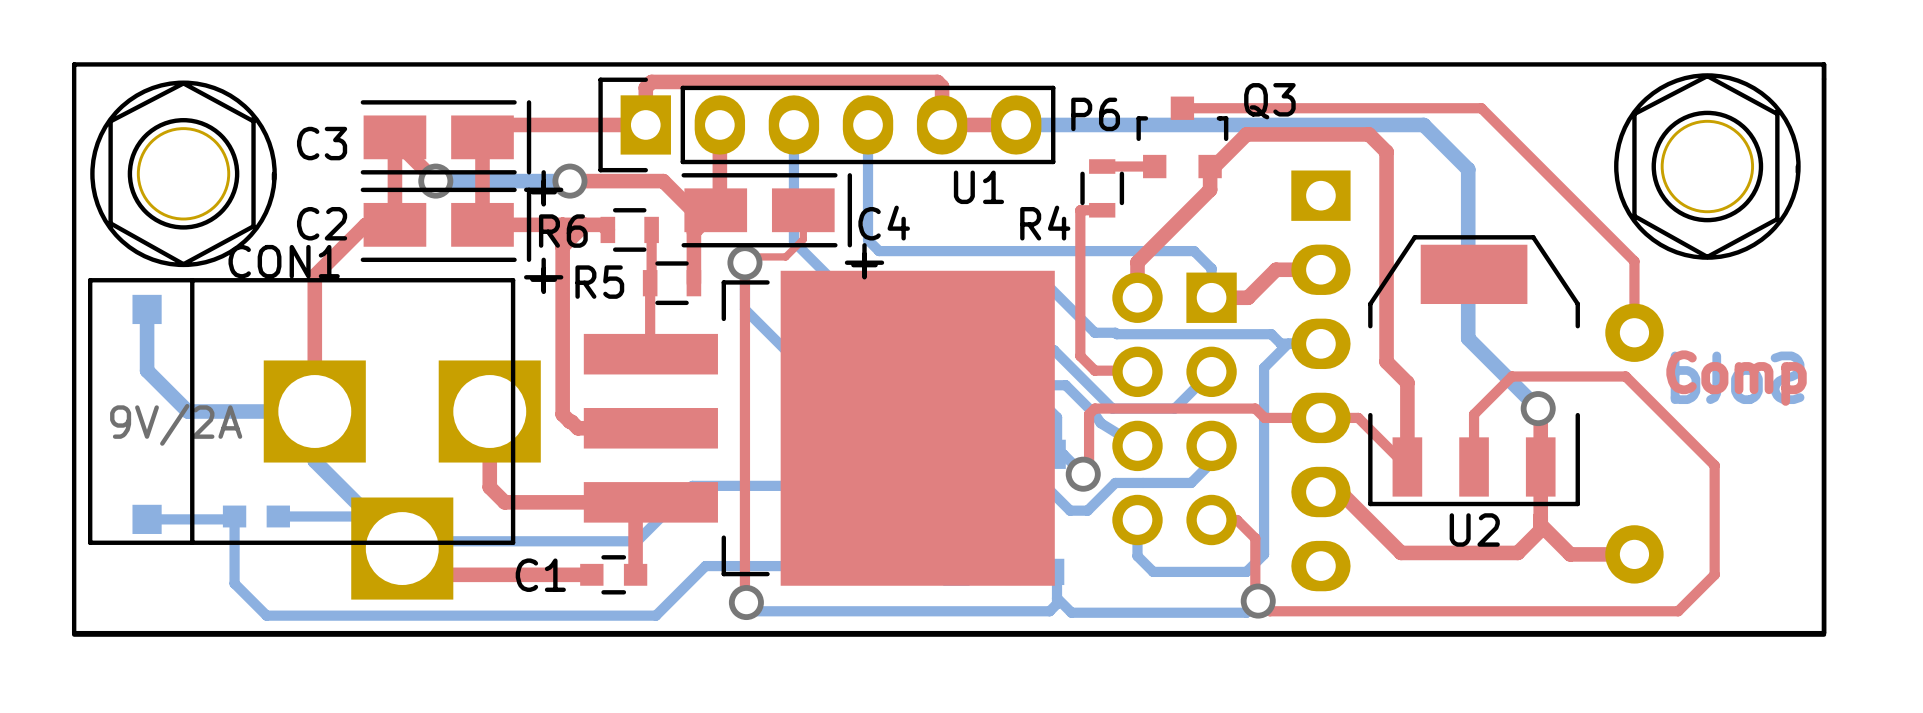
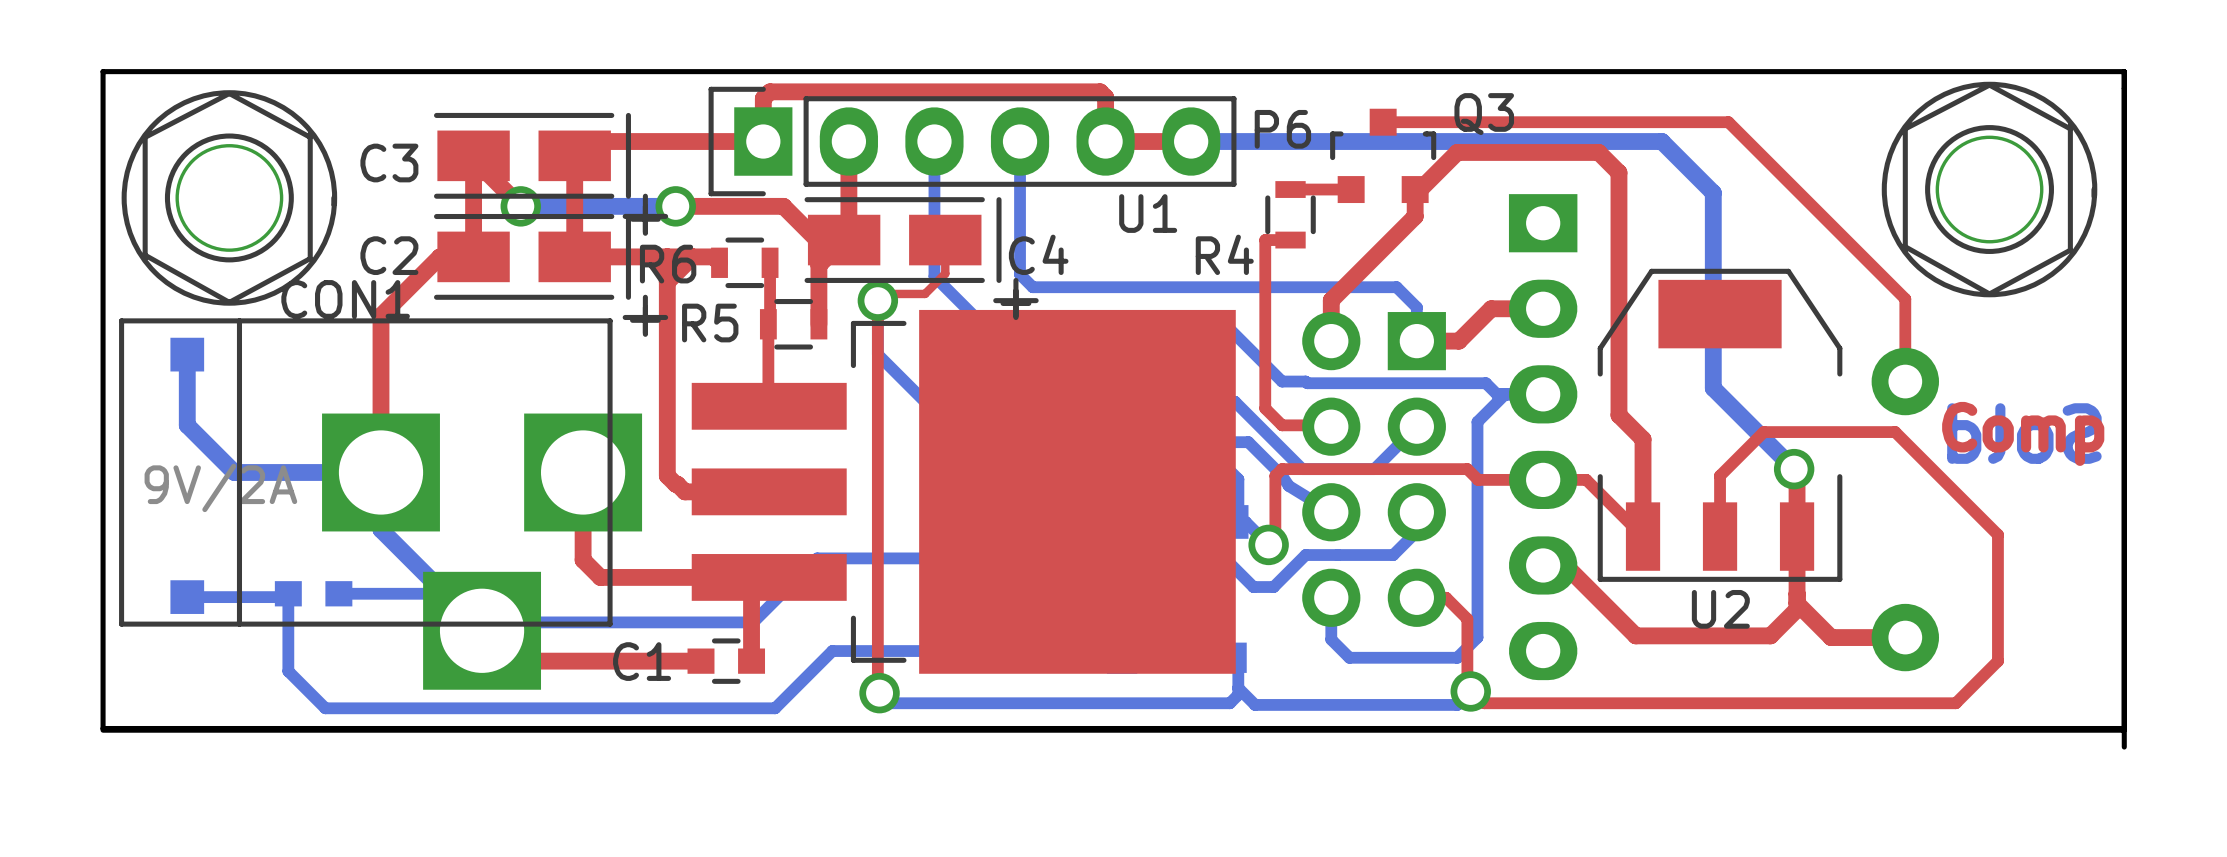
board edge: none -> (2124, 730) (2124, 747)

